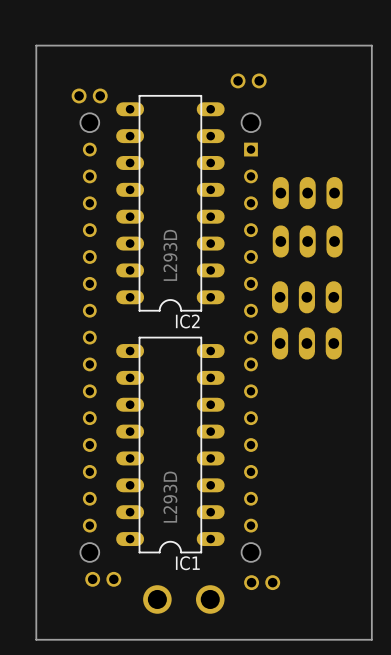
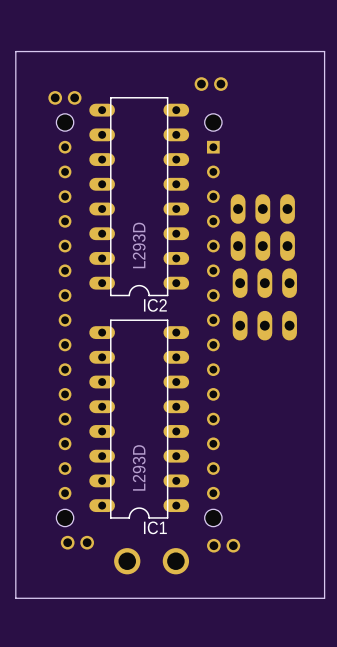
part: (307, 193) -> none
part: none -> (262, 209)
part: (307, 241) -> none
part: none -> (262, 246)

